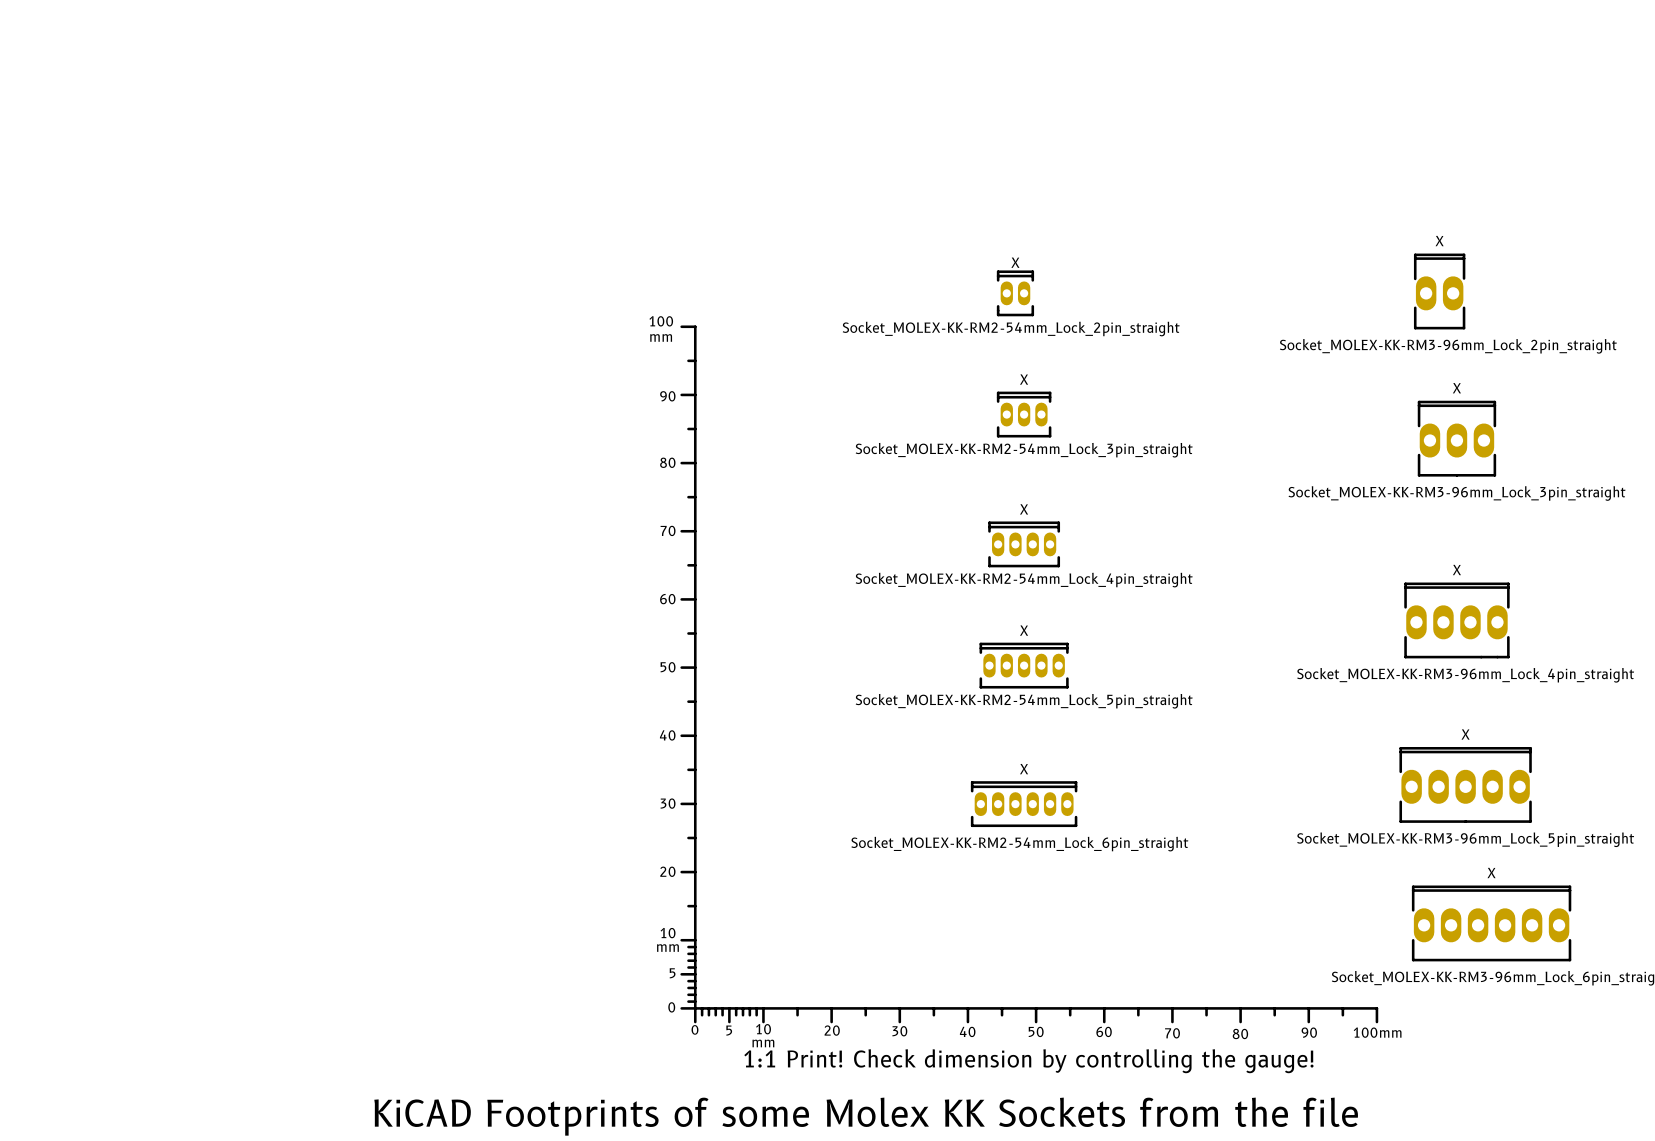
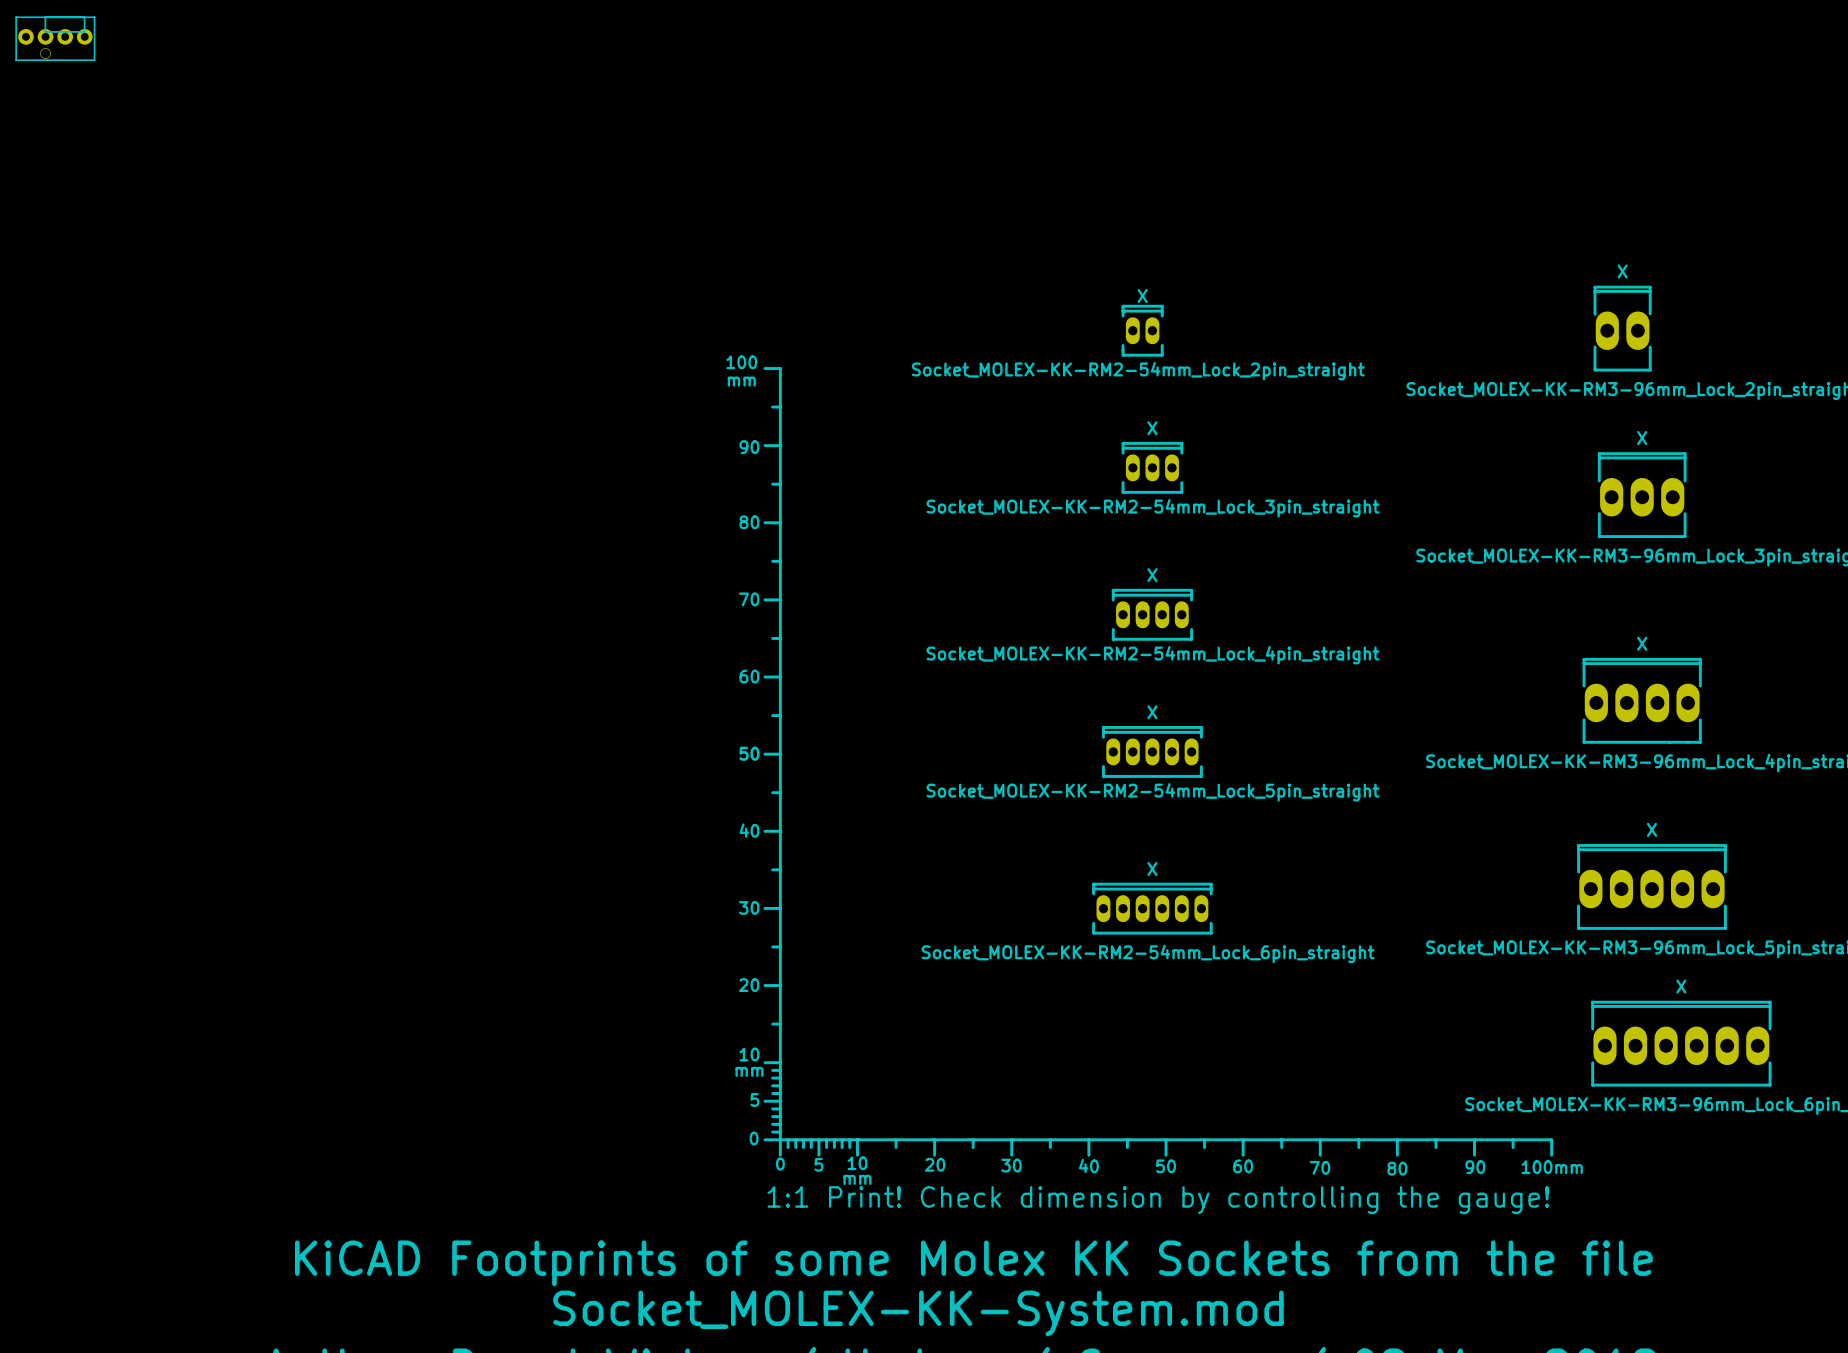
part: none -> (55, 38)

